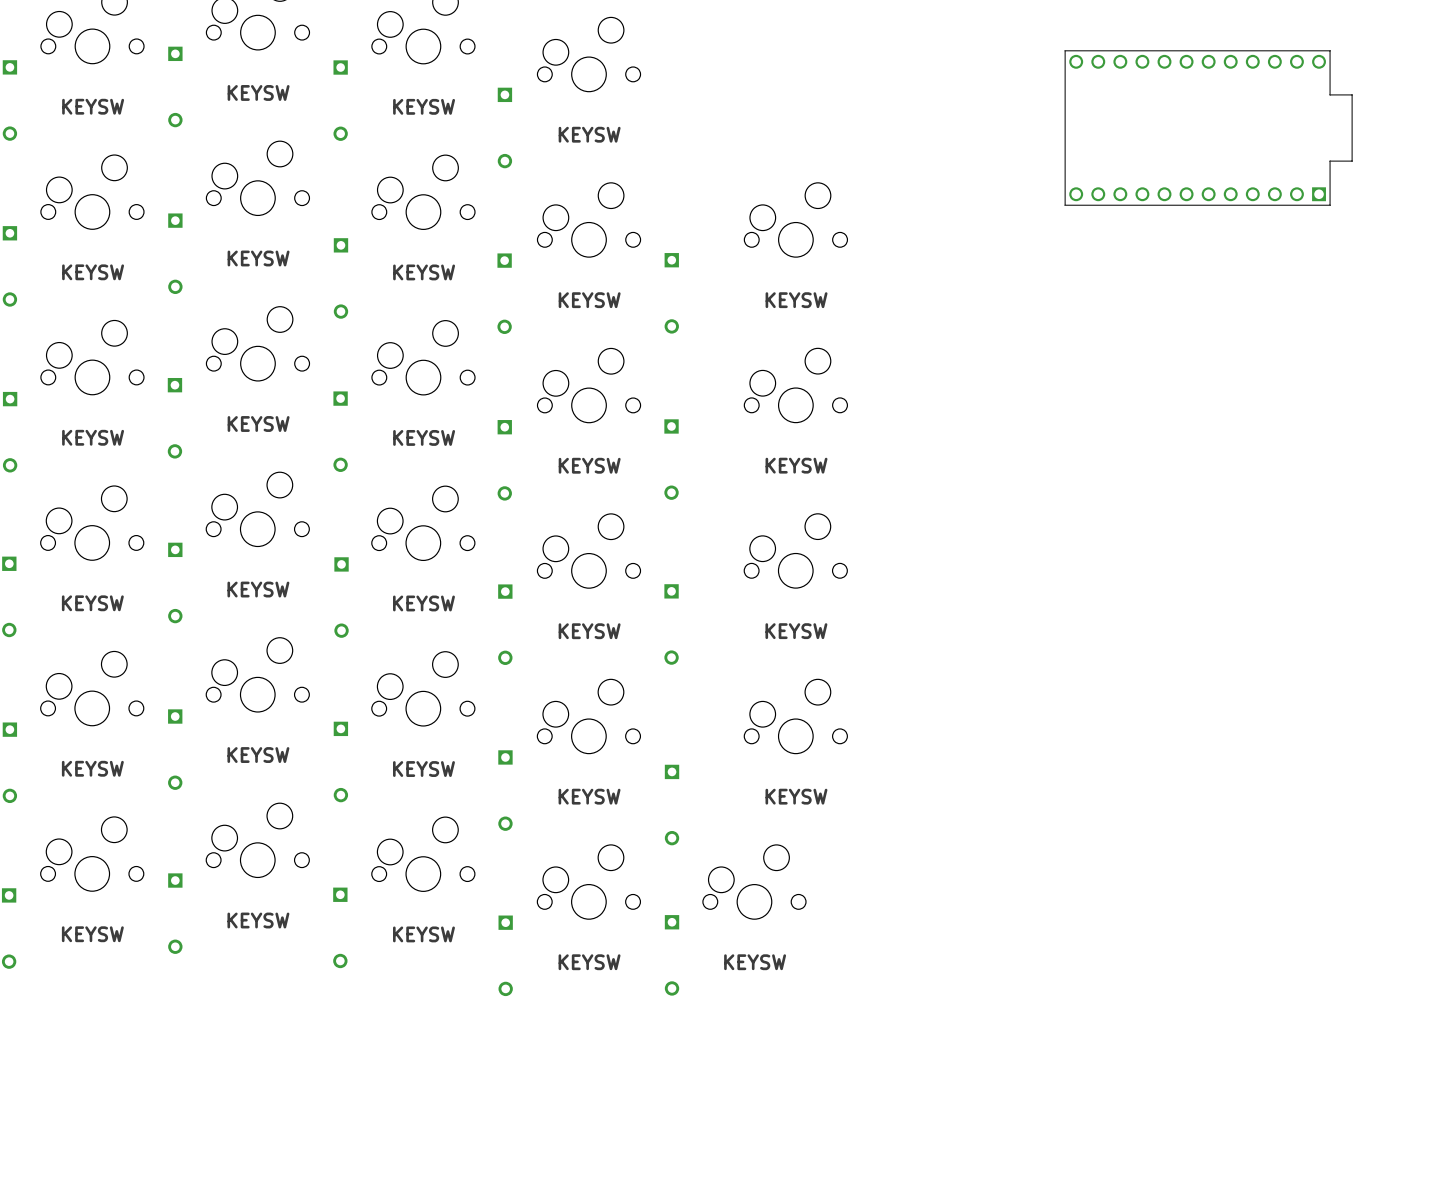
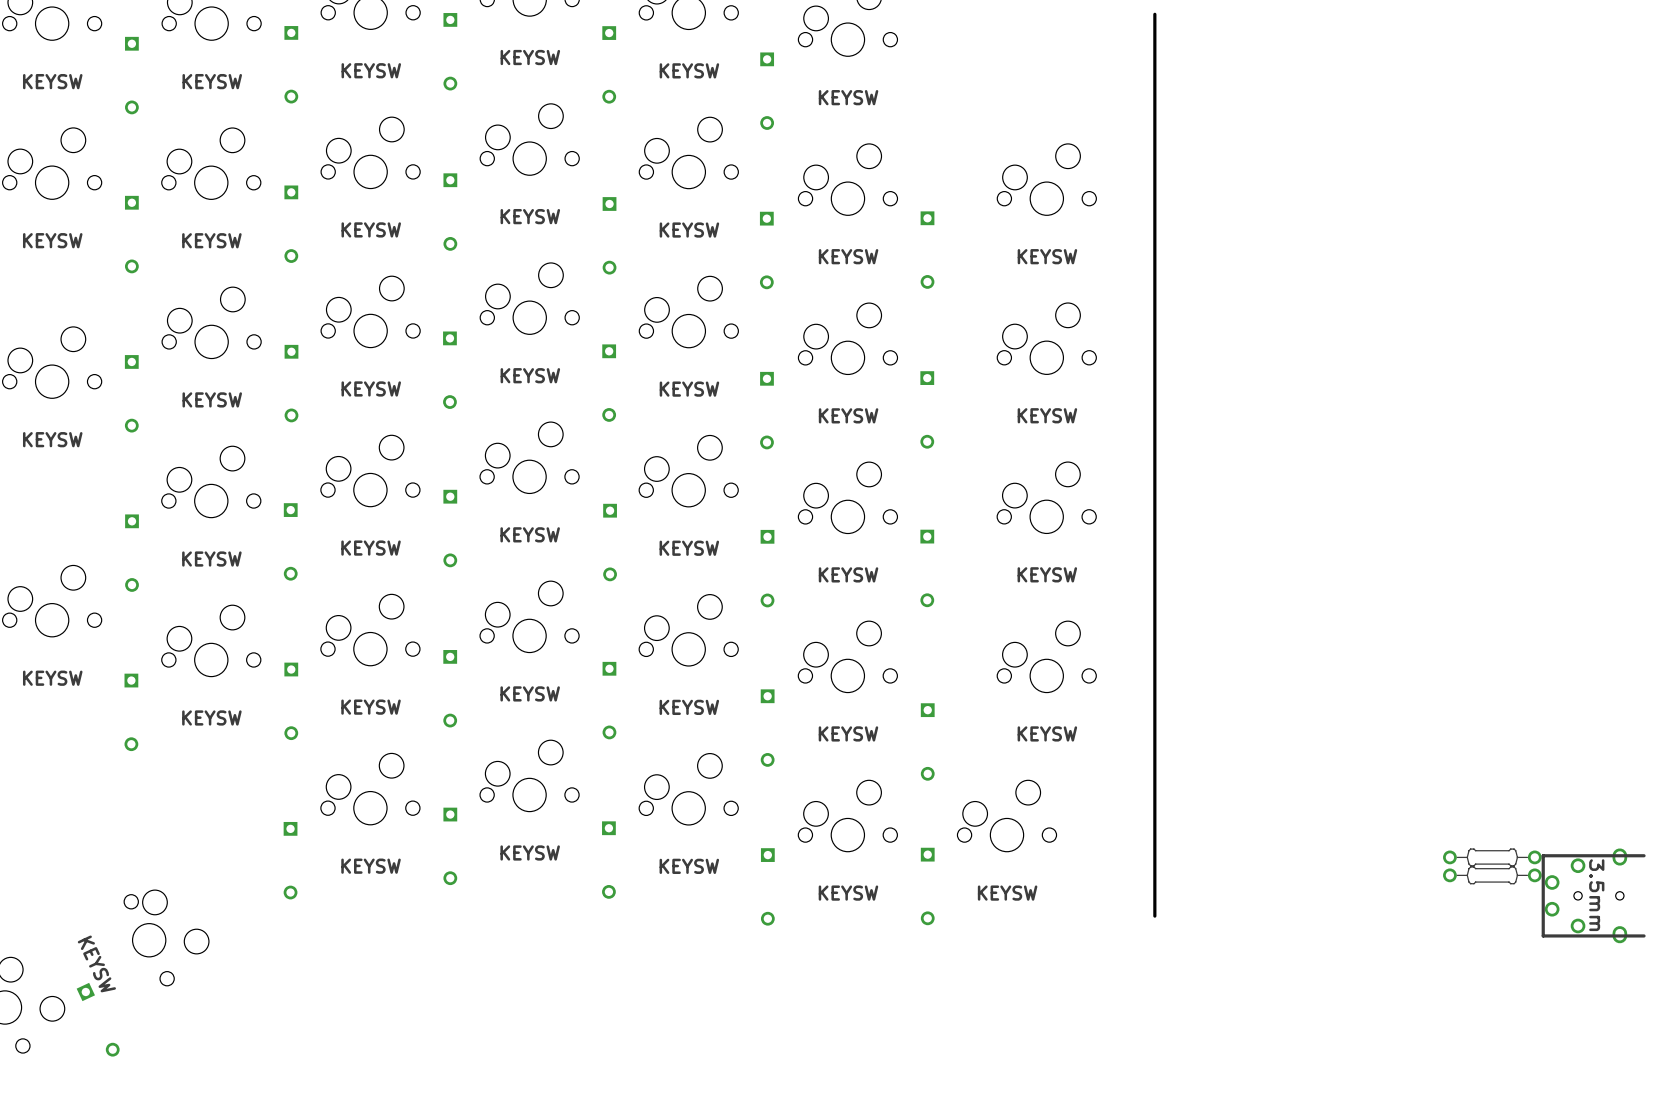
board edge: none -> (1154, 14) (1154, 916)
part: (1208, 128) -> none
part: none -> (1492, 857)
part: none -> (1492, 875)
part: none -> (1593, 895)

